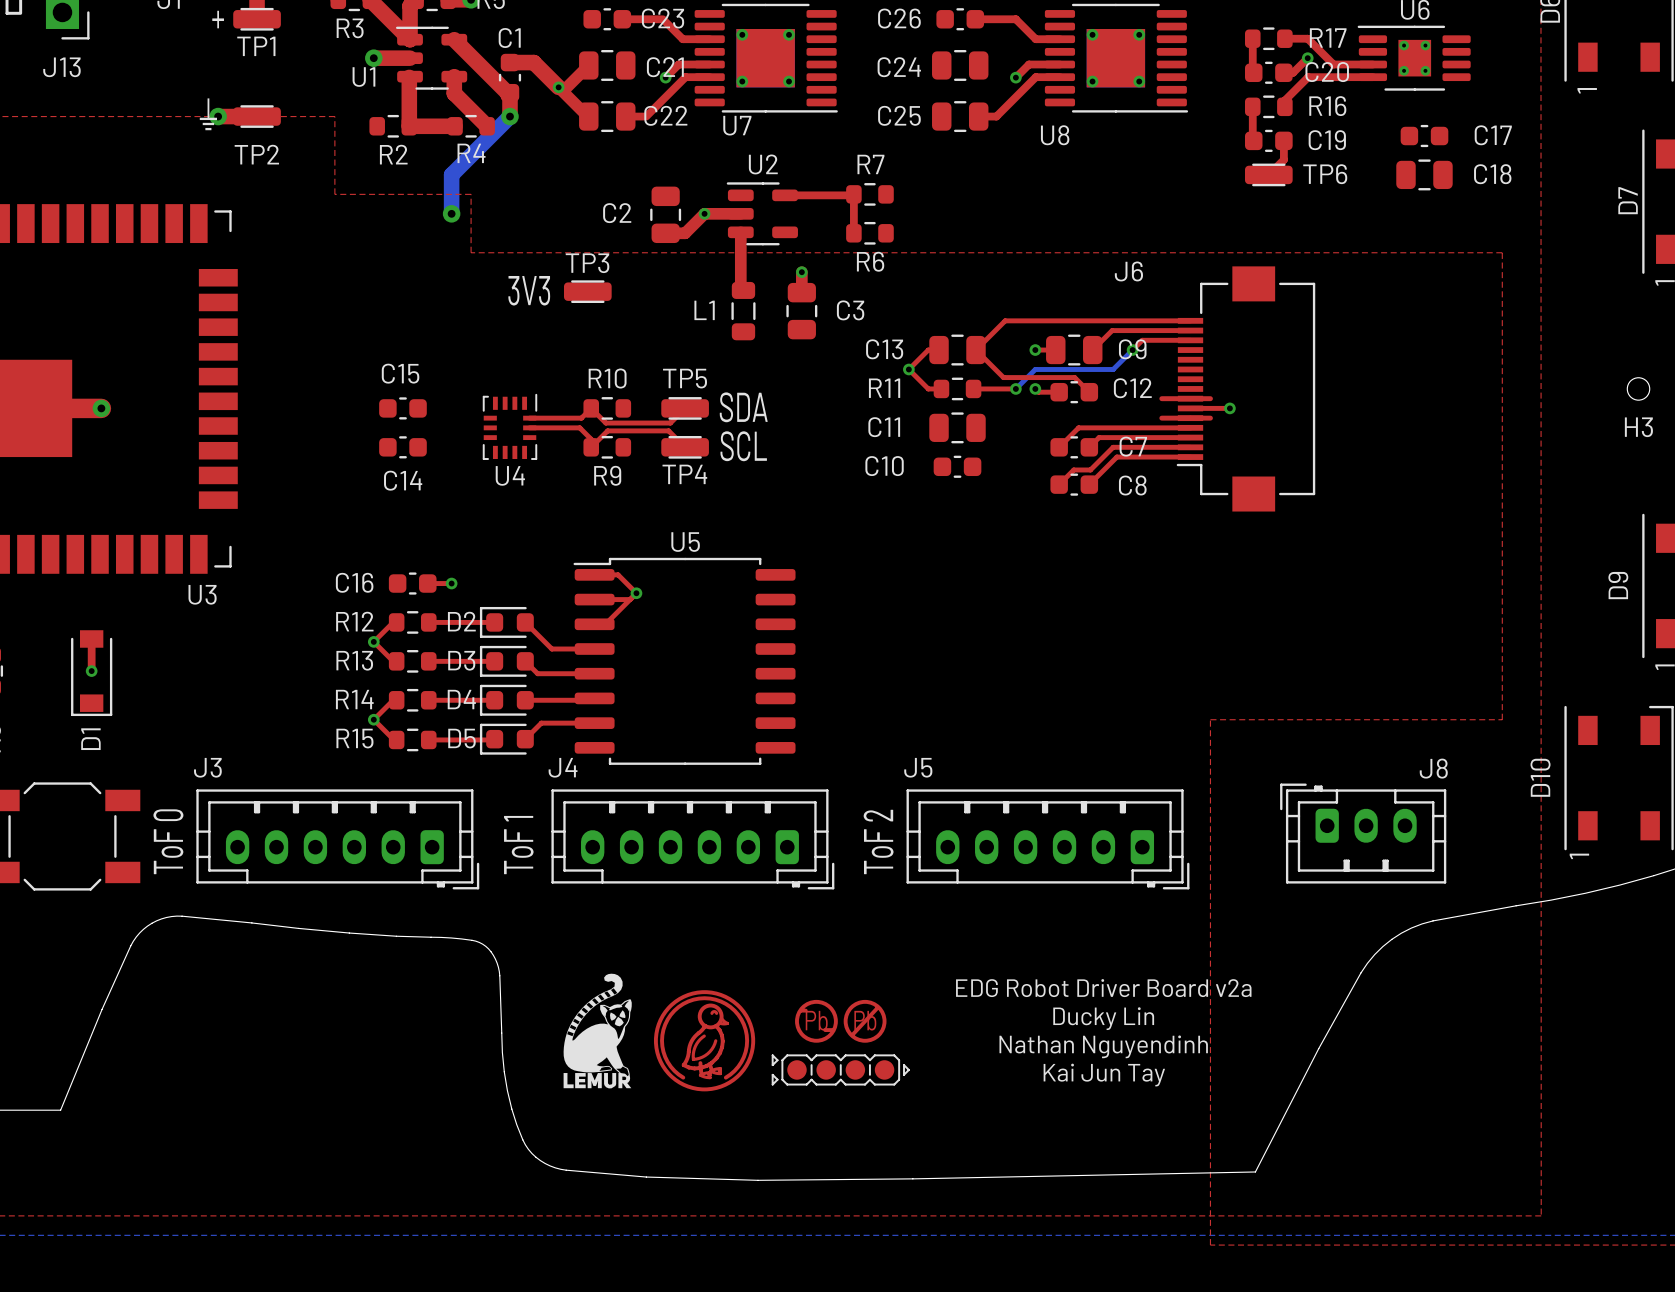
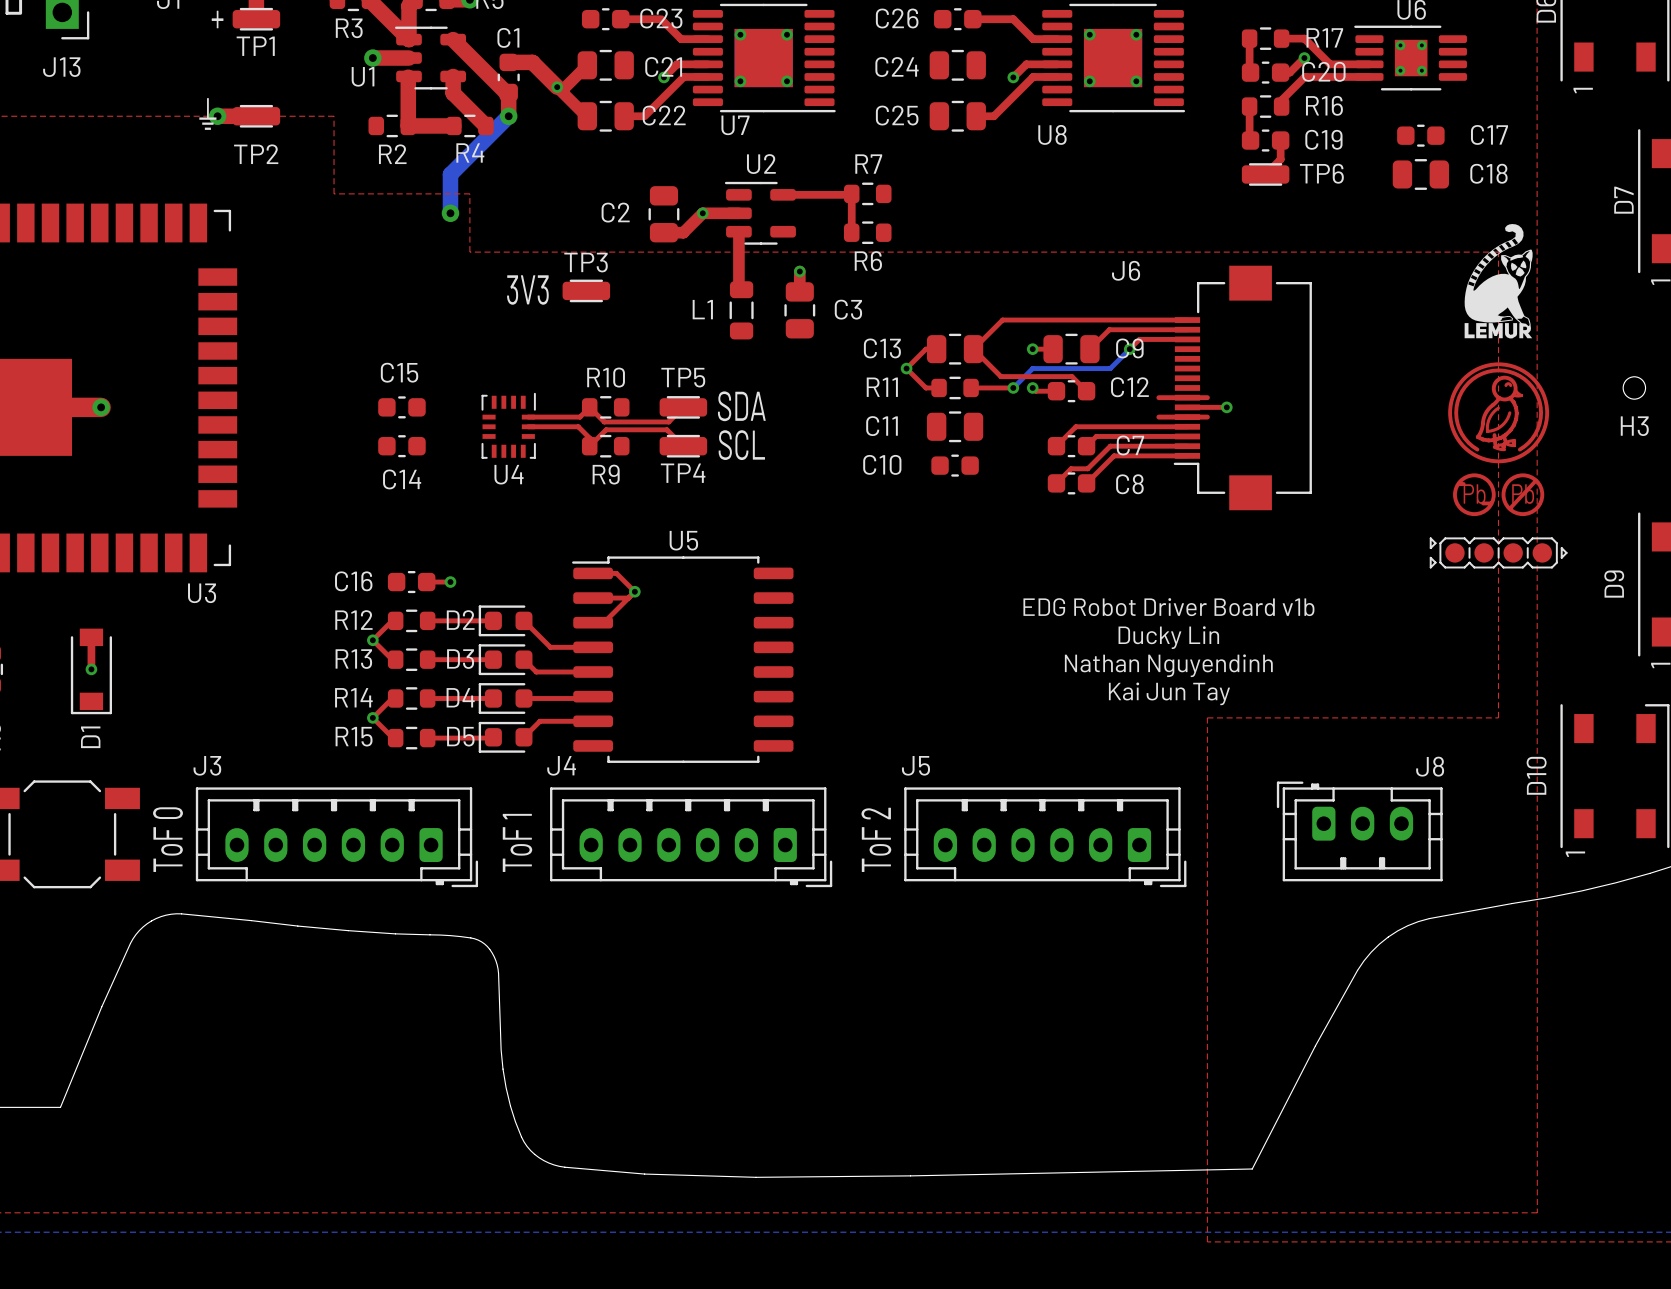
drawing: none -> [1464, 224, 1533, 339]
drawing: none -> [1429, 362, 1568, 569]
text: none -> EDG Robot Driver Board v1b (1168, 607)
drawing: [563, 973, 910, 1092] -> none
text: EDG Robot Driver Board v2a (1103, 988) -> none
text position: Ducky Lin (1103, 1018) -> Ducky Lin (1168, 637)
text position: Nathan Nguyendinh (1103, 1046) -> Nathan Nguyendinh (1168, 665)
text position: Kai Jun Tay (1104, 1075) -> Kai Jun Tay (1169, 693)

